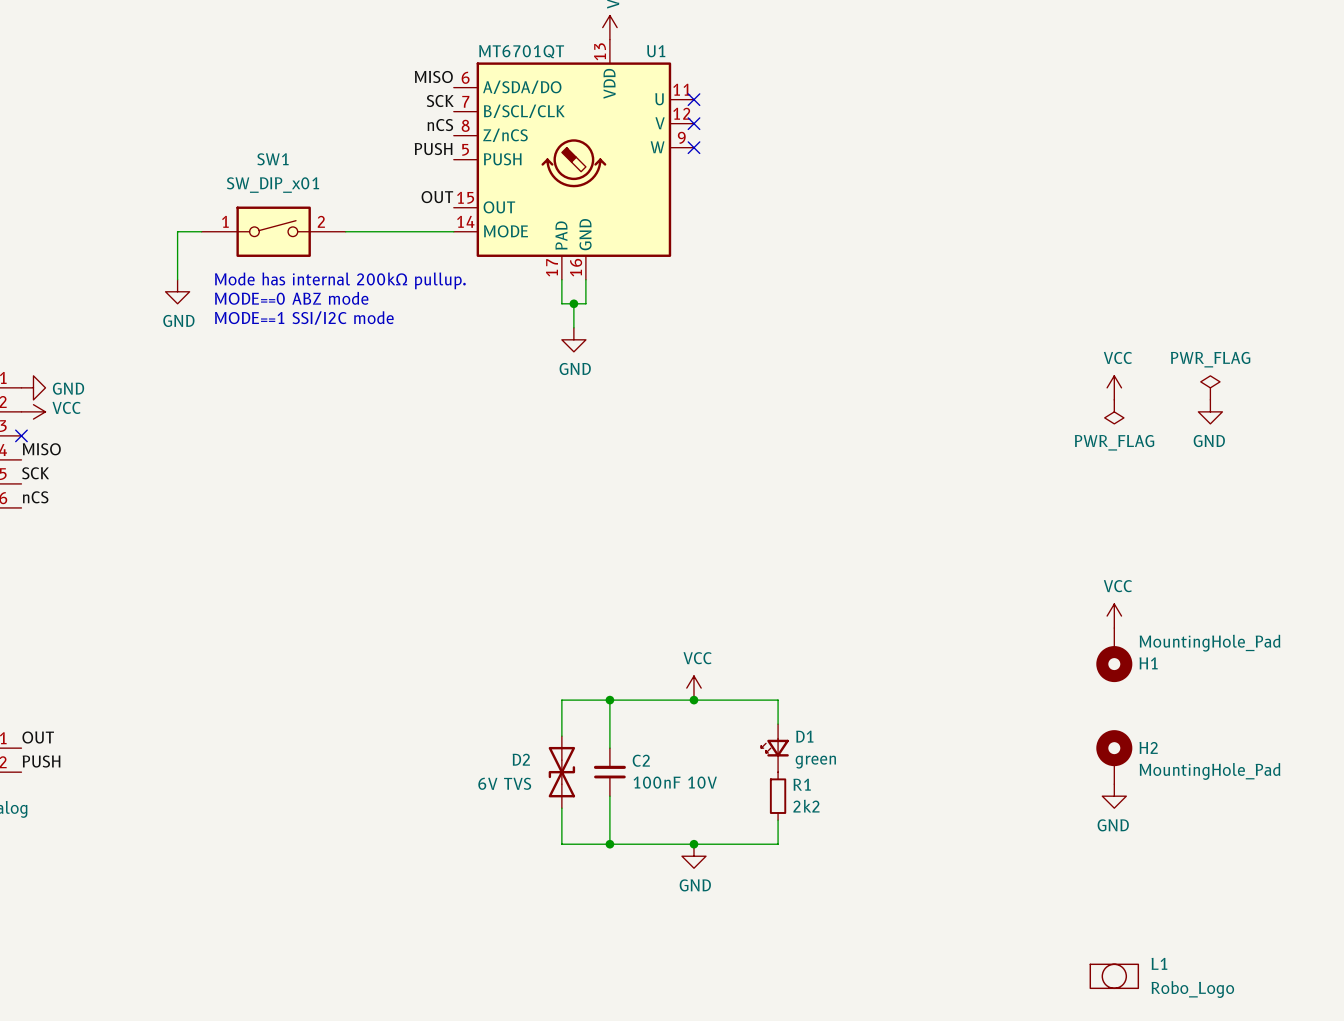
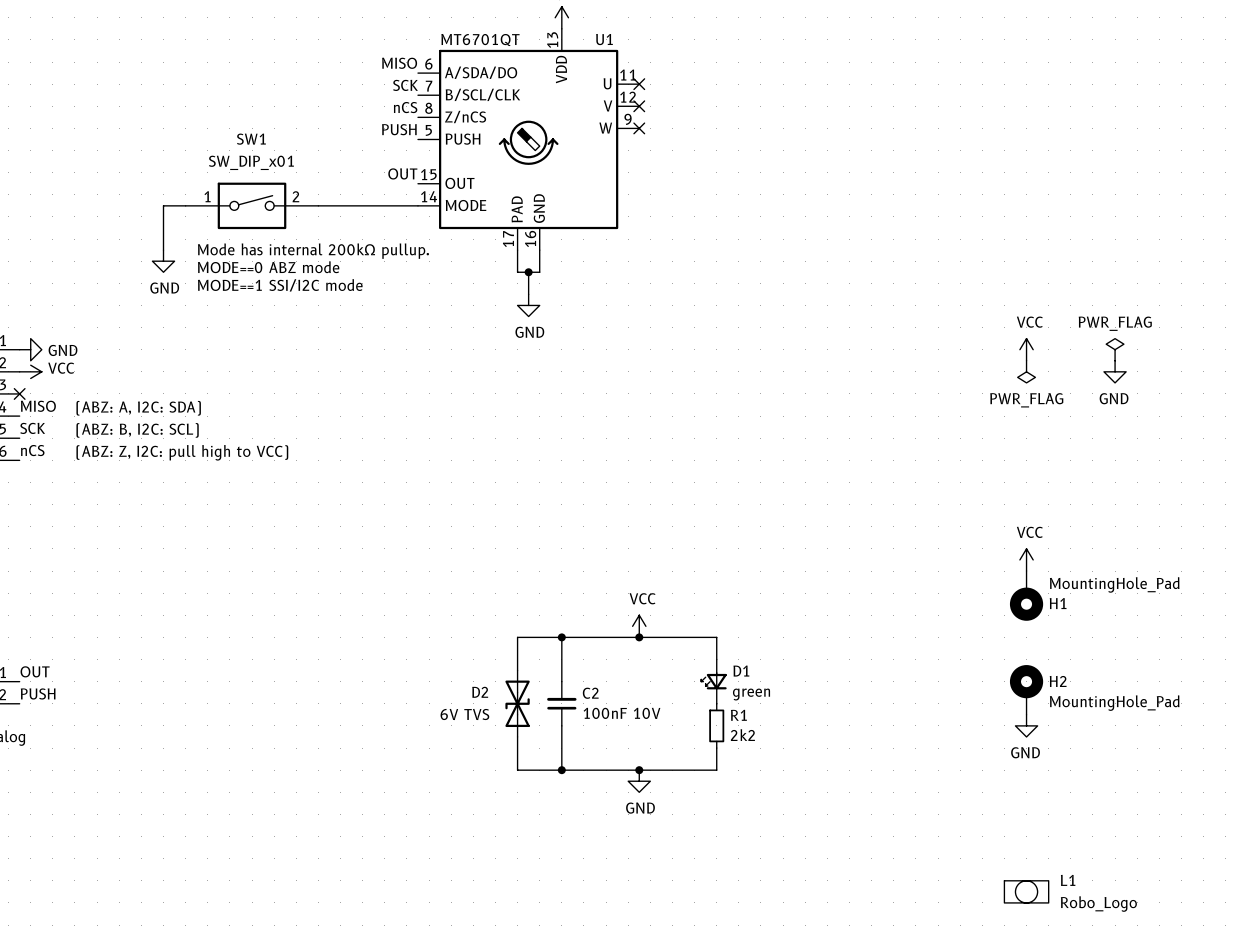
text: none -> (ABZ: A, I2C: SDA) (138, 408)
text: none -> (ABZ: B, I2C: SCL) (137, 430)
text: none -> (ABZ: Z, I2C: pull high to VCC) (182, 452)

